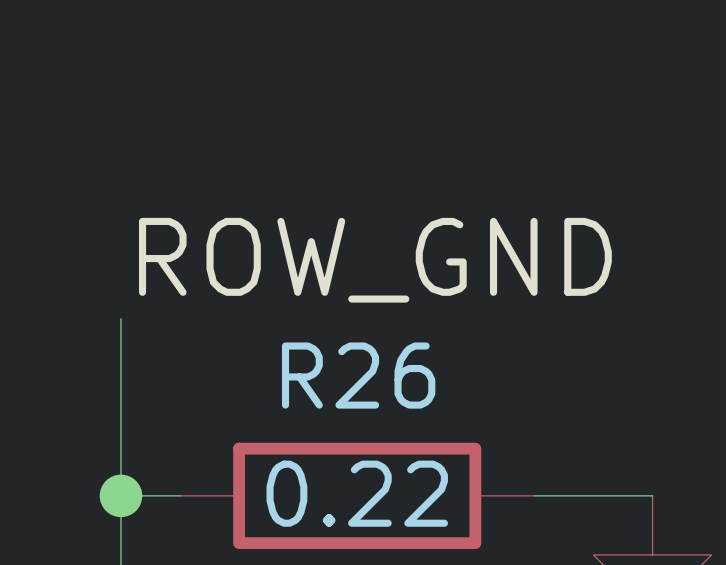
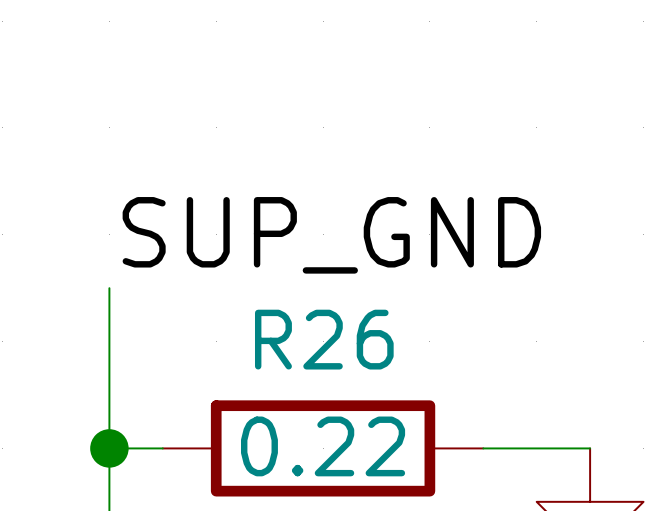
label: ROW_GND (375, 260) -> SUP_GND (331, 235)

